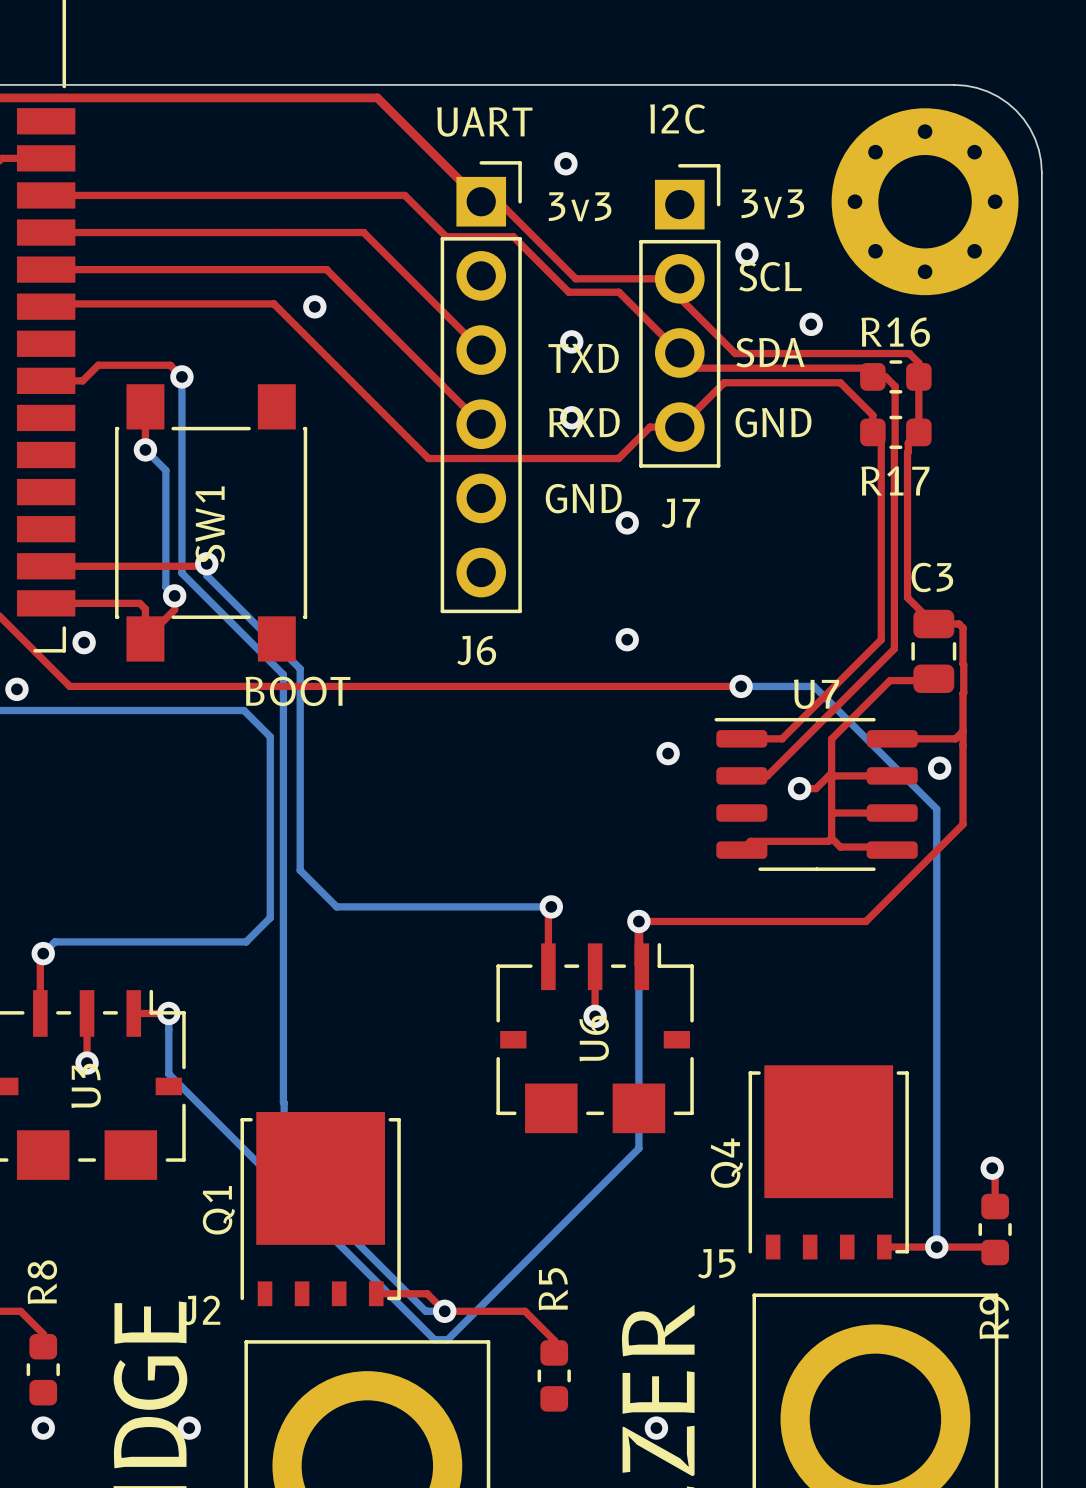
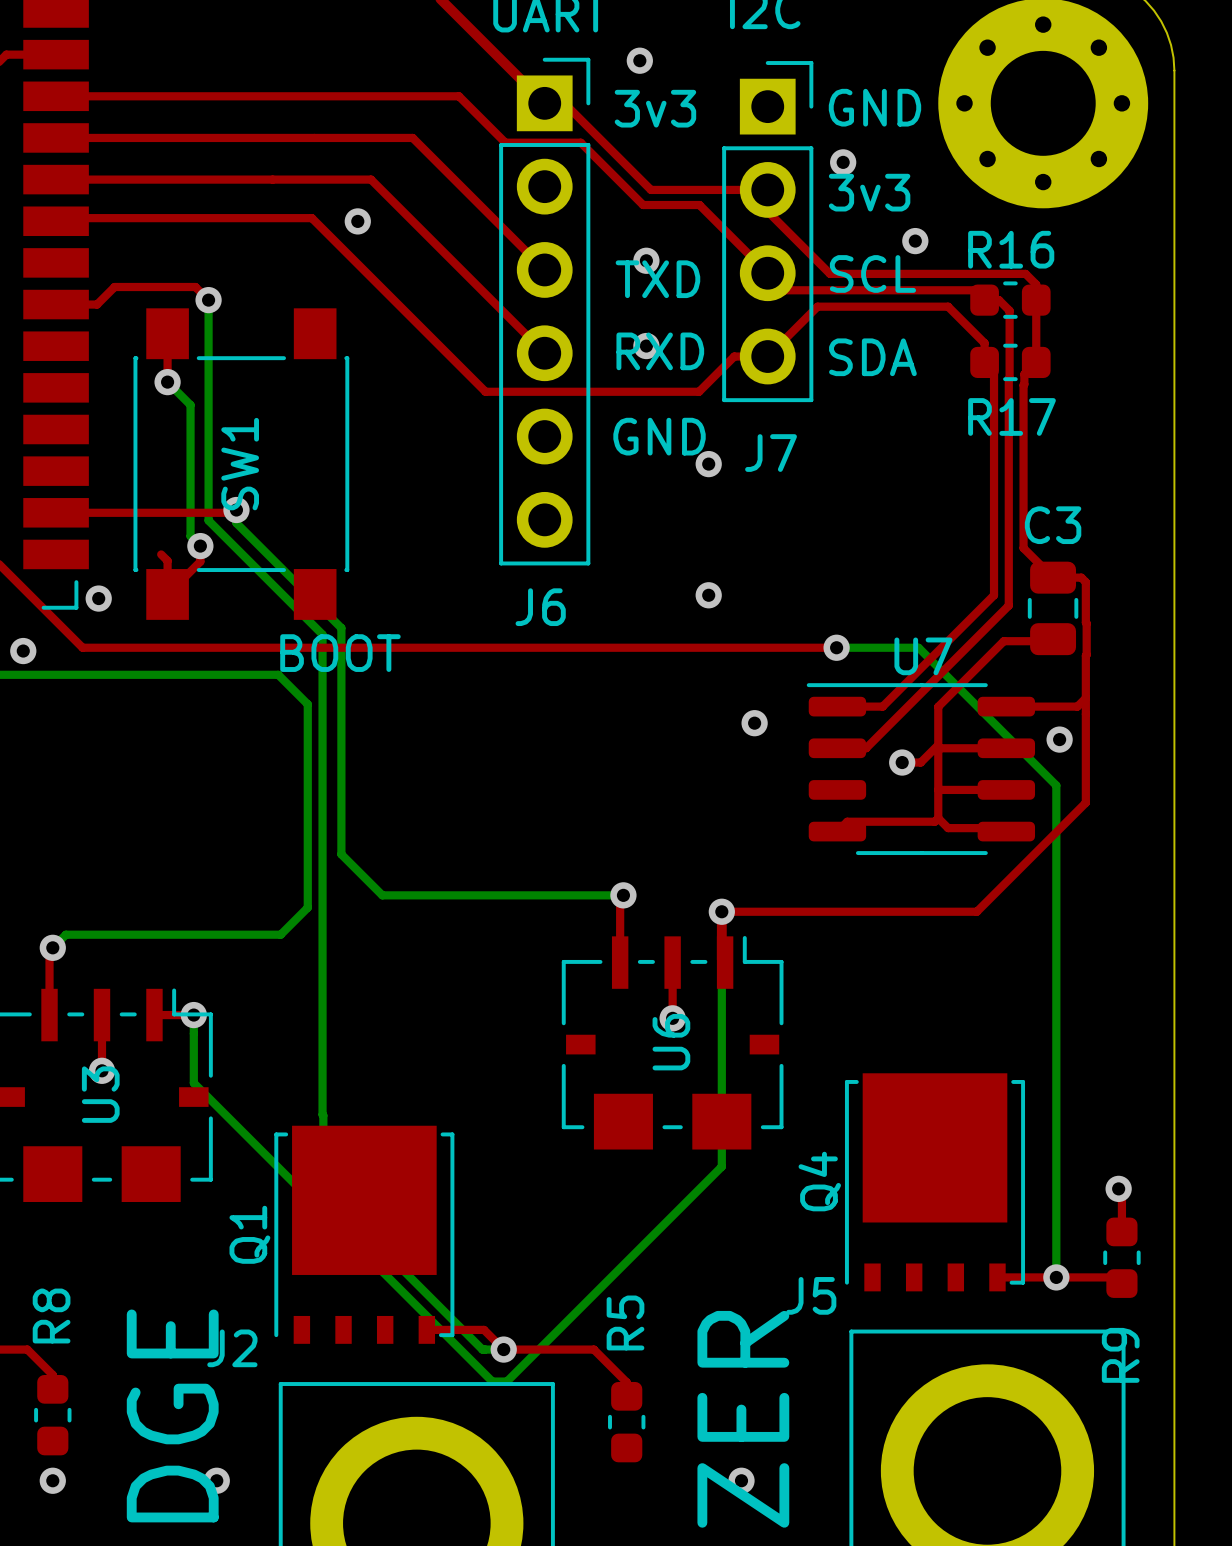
text: 3v3 (772, 203) -> GND (874, 107)
text: SCL (770, 276) -> 3v3 (869, 192)
text: SDA (770, 352) -> SCL (872, 273)
text: GND (773, 422) -> SDA (872, 357)
top track: (46, 603) (139, 603) -> none

